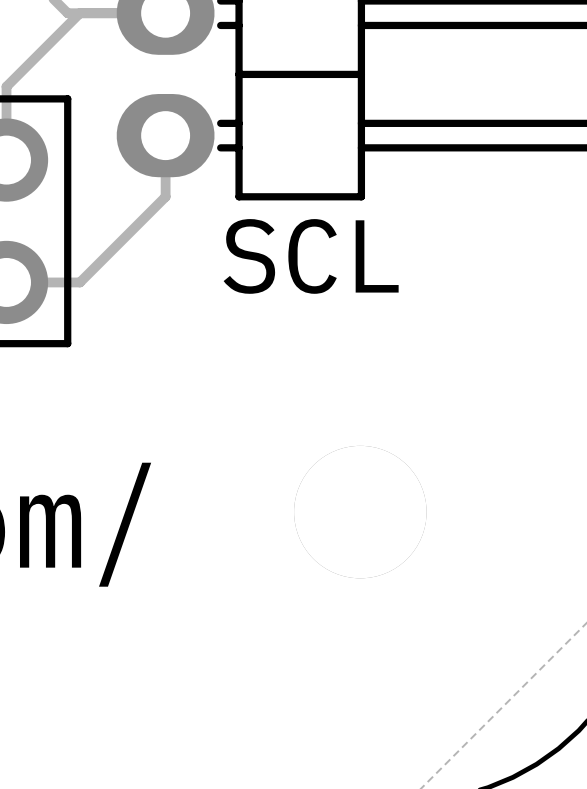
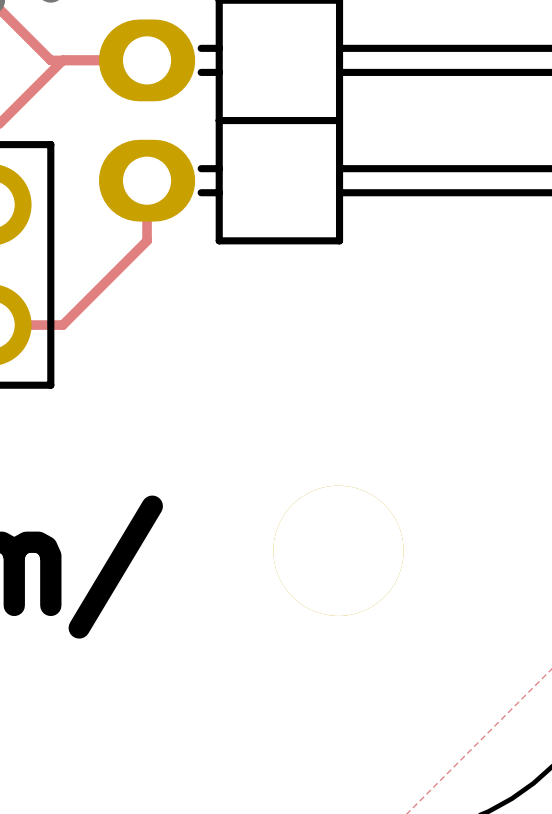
text: SCL (311, 256) -> none

